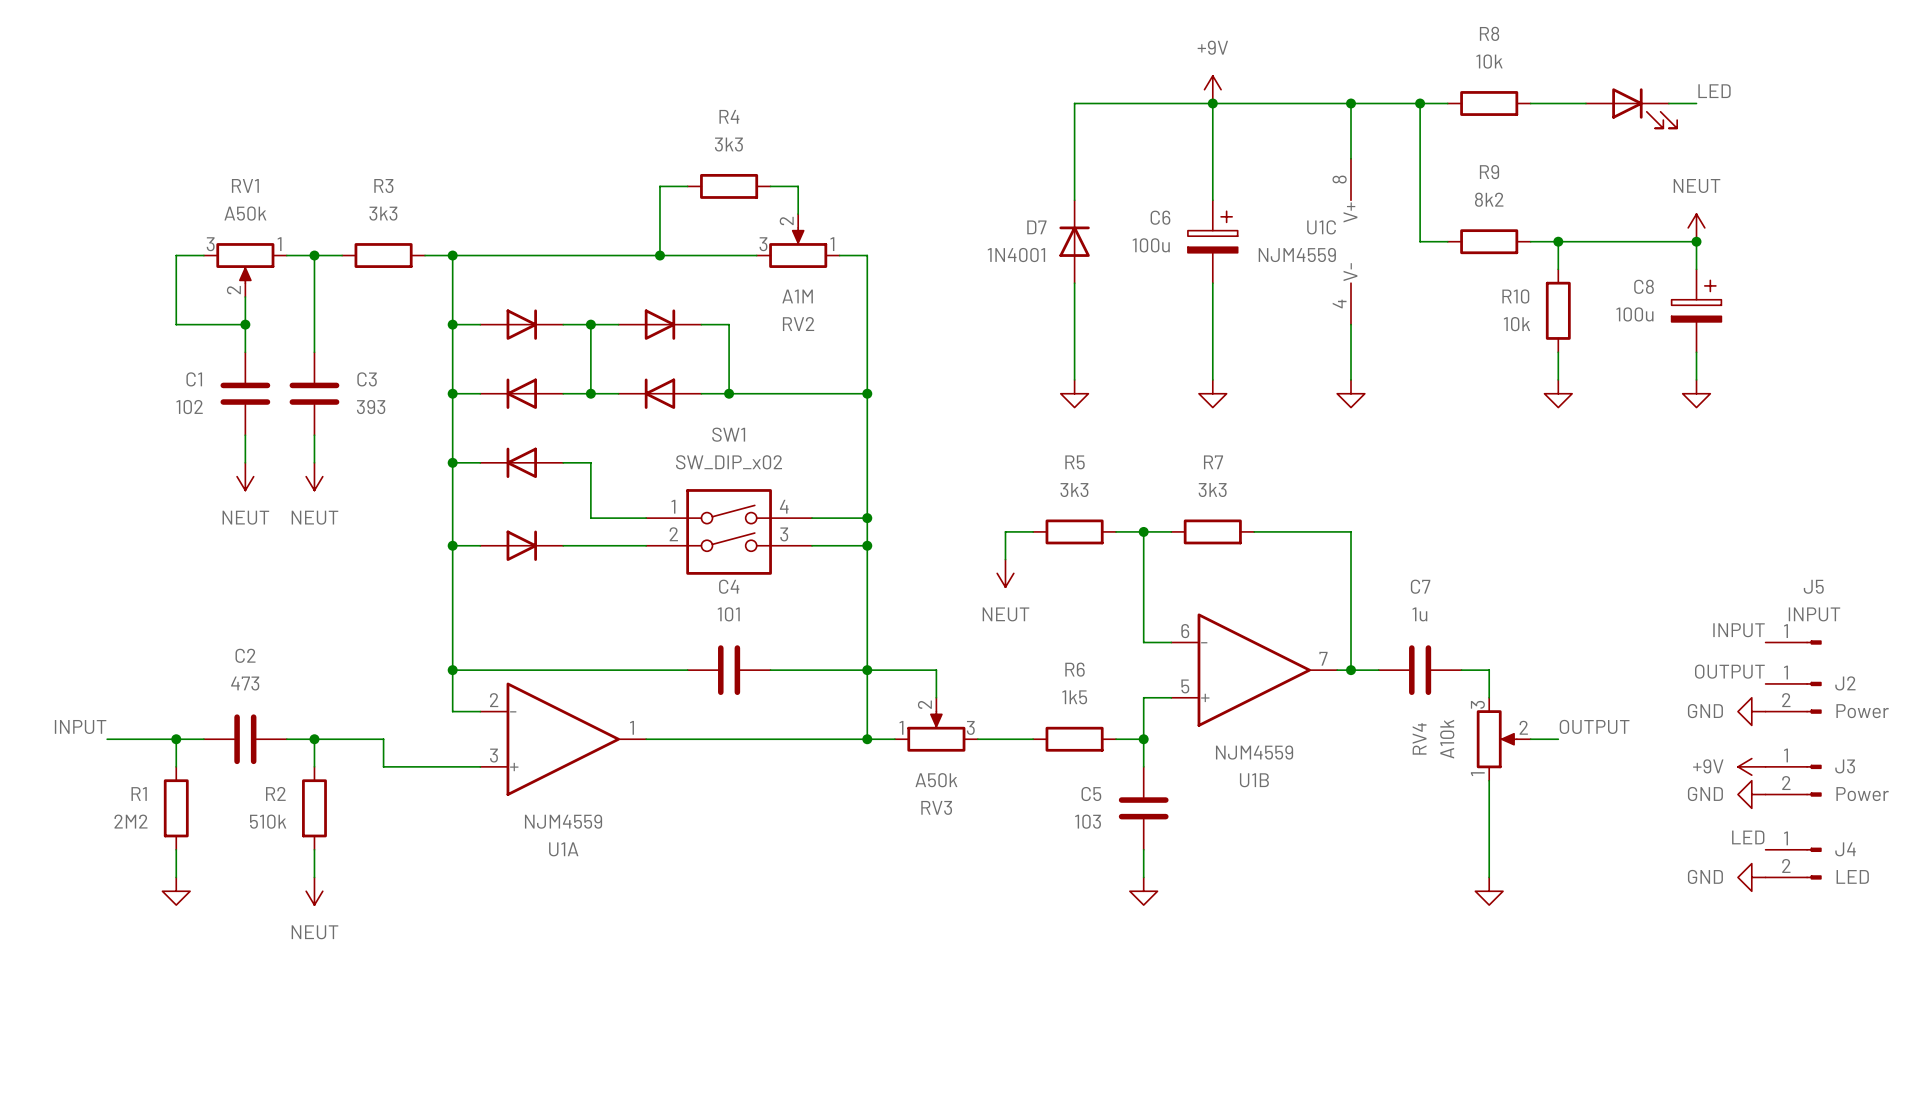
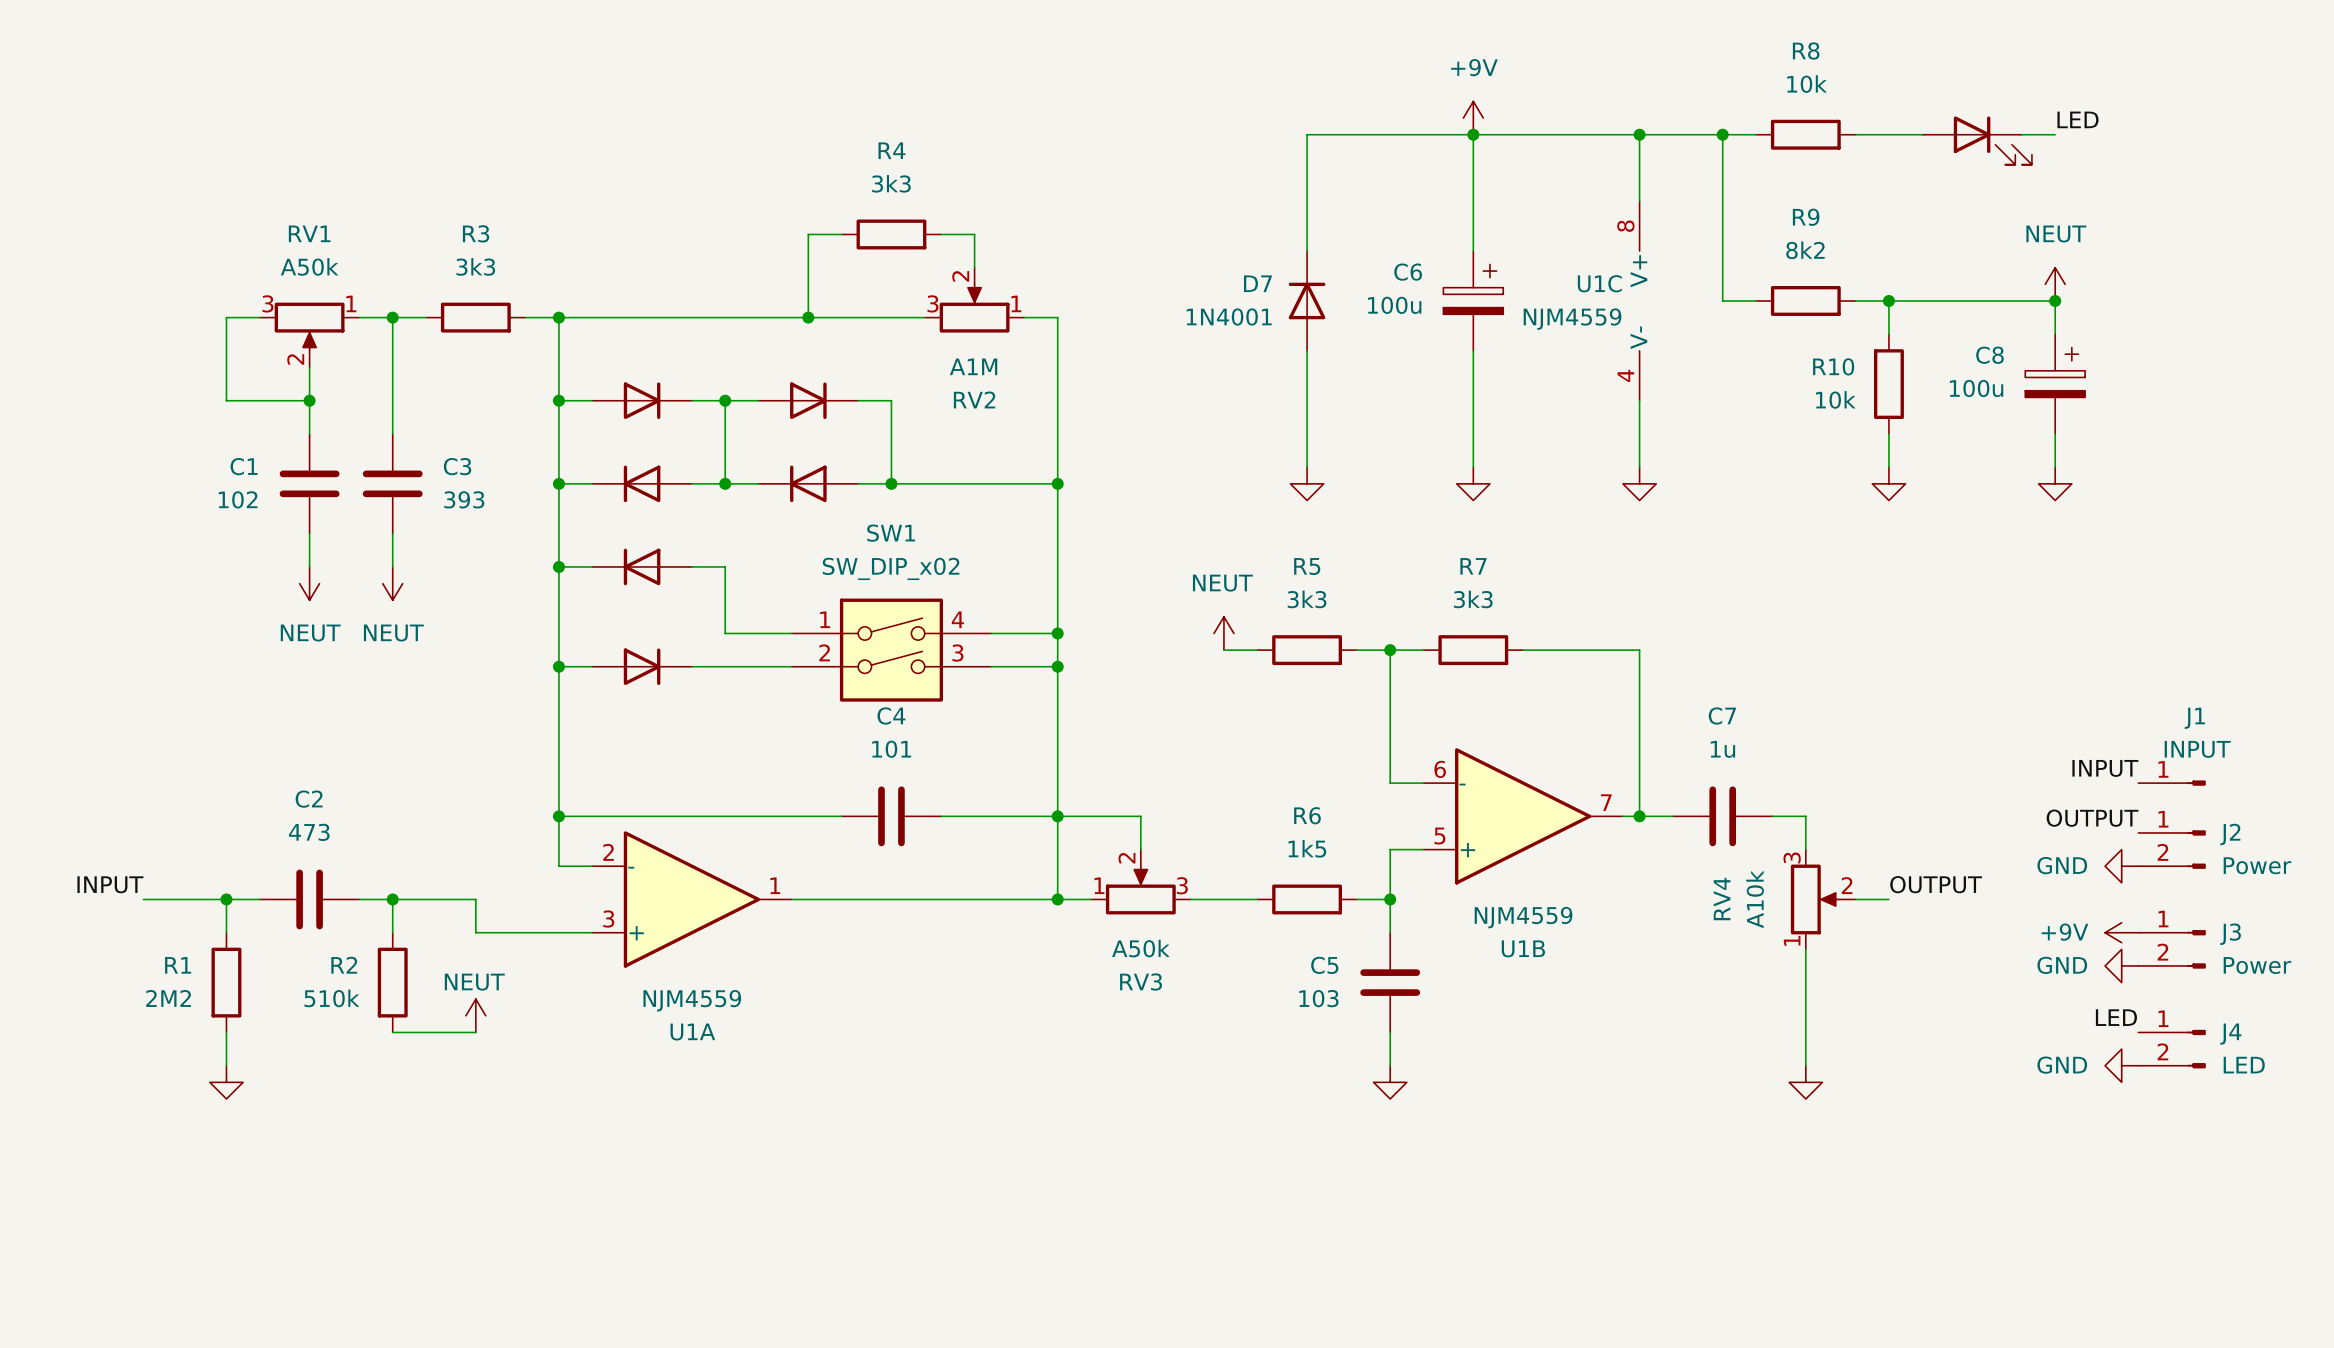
wire: (1005, 531) (1005, 559) -> none
power symbol rotation: 0° (1005, 573) -> 180° (1223, 633)
power symbol position: NEUT (1005, 573) -> NEUT (1223, 633)
J5 name: J5 (1813, 586) -> J1 (2194, 718)
wire: (314, 849) (314, 877) -> (392, 1032) (475, 1032)
power symbol rotation: 0° (314, 891) -> 180° (475, 1015)
power symbol position: NEUT (314, 891) -> NEUT (475, 1015)

